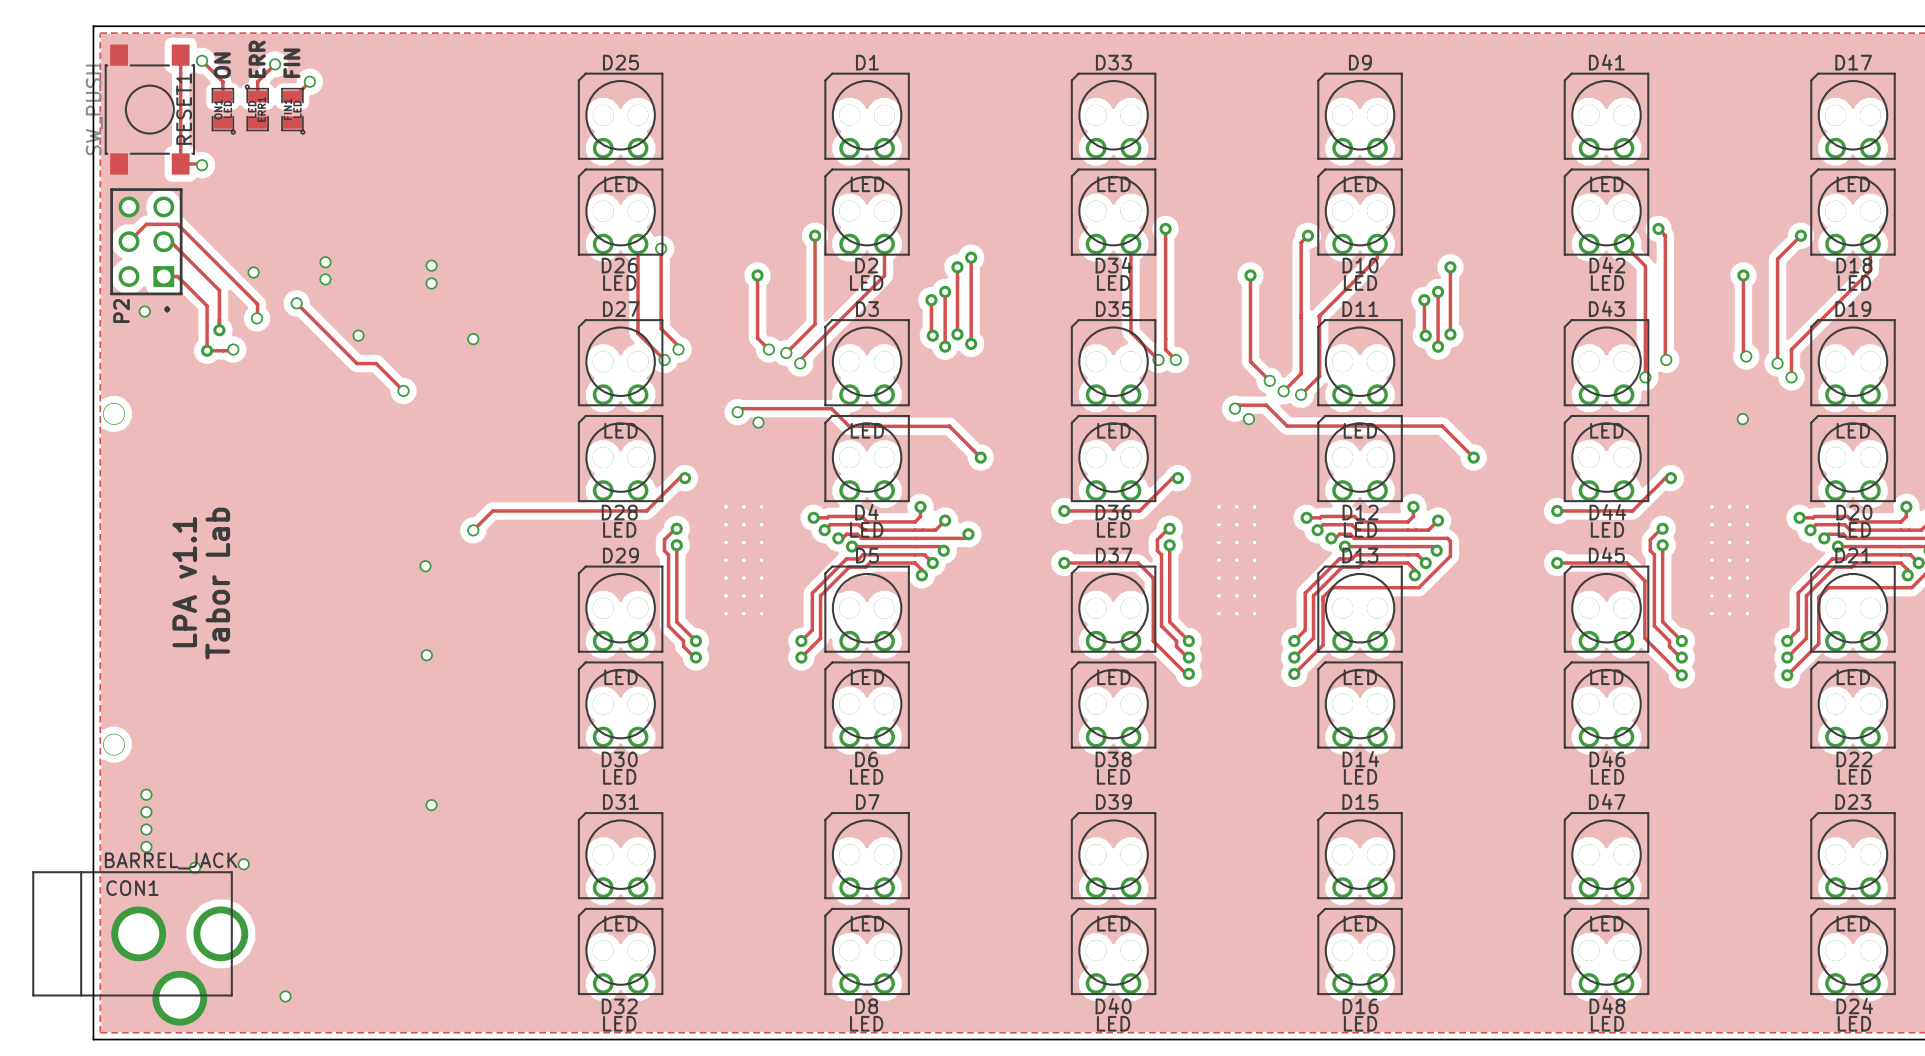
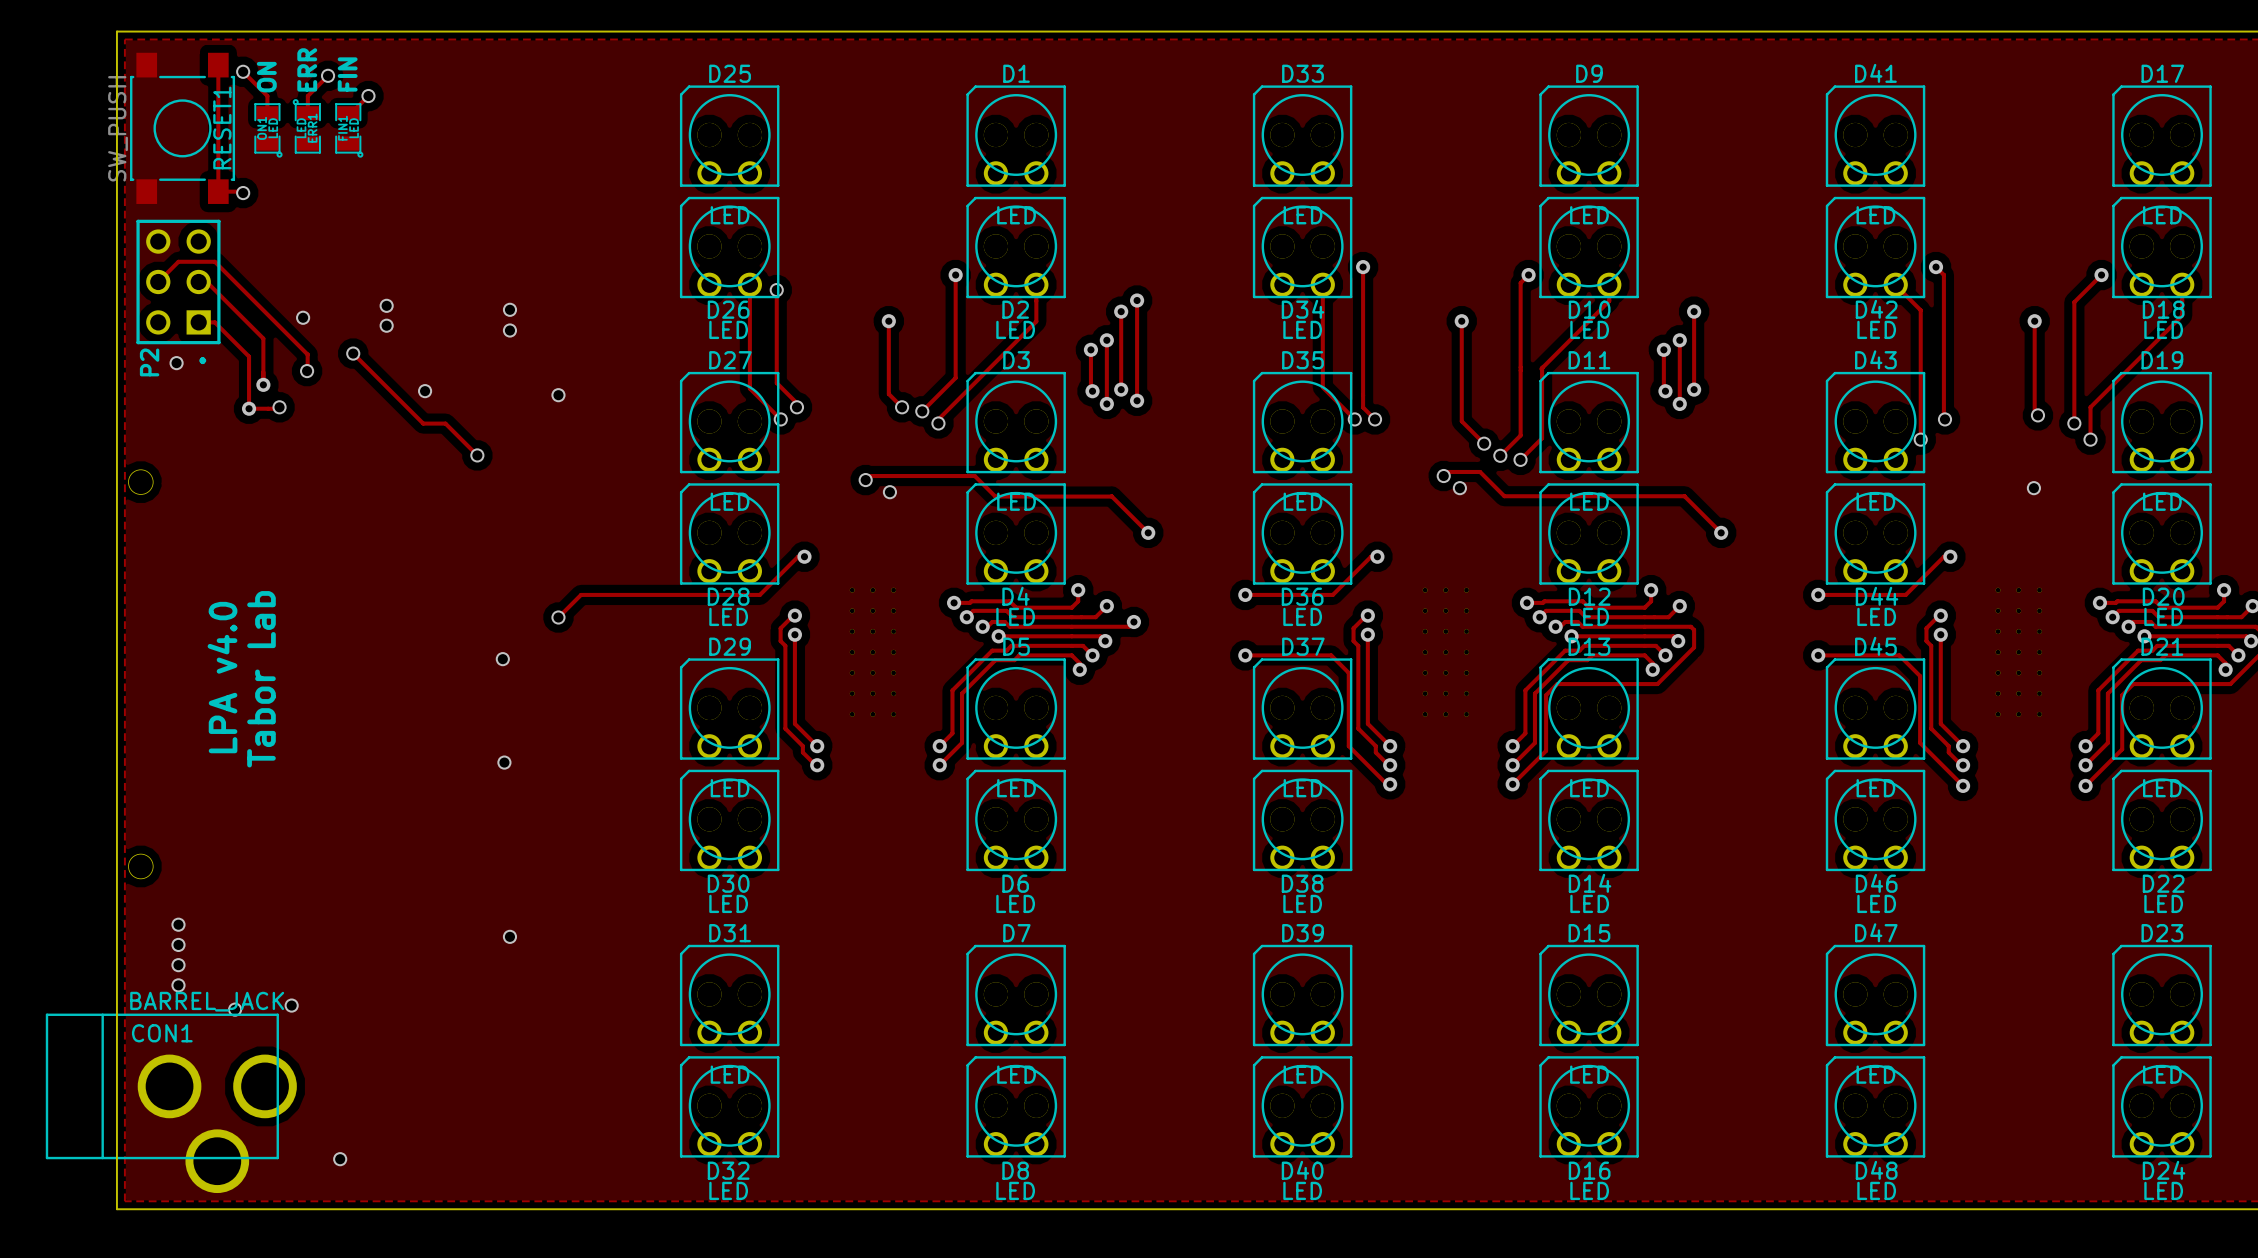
text: LPA v1.1 (184, 582) -> LPA v4.0 (222, 677)

